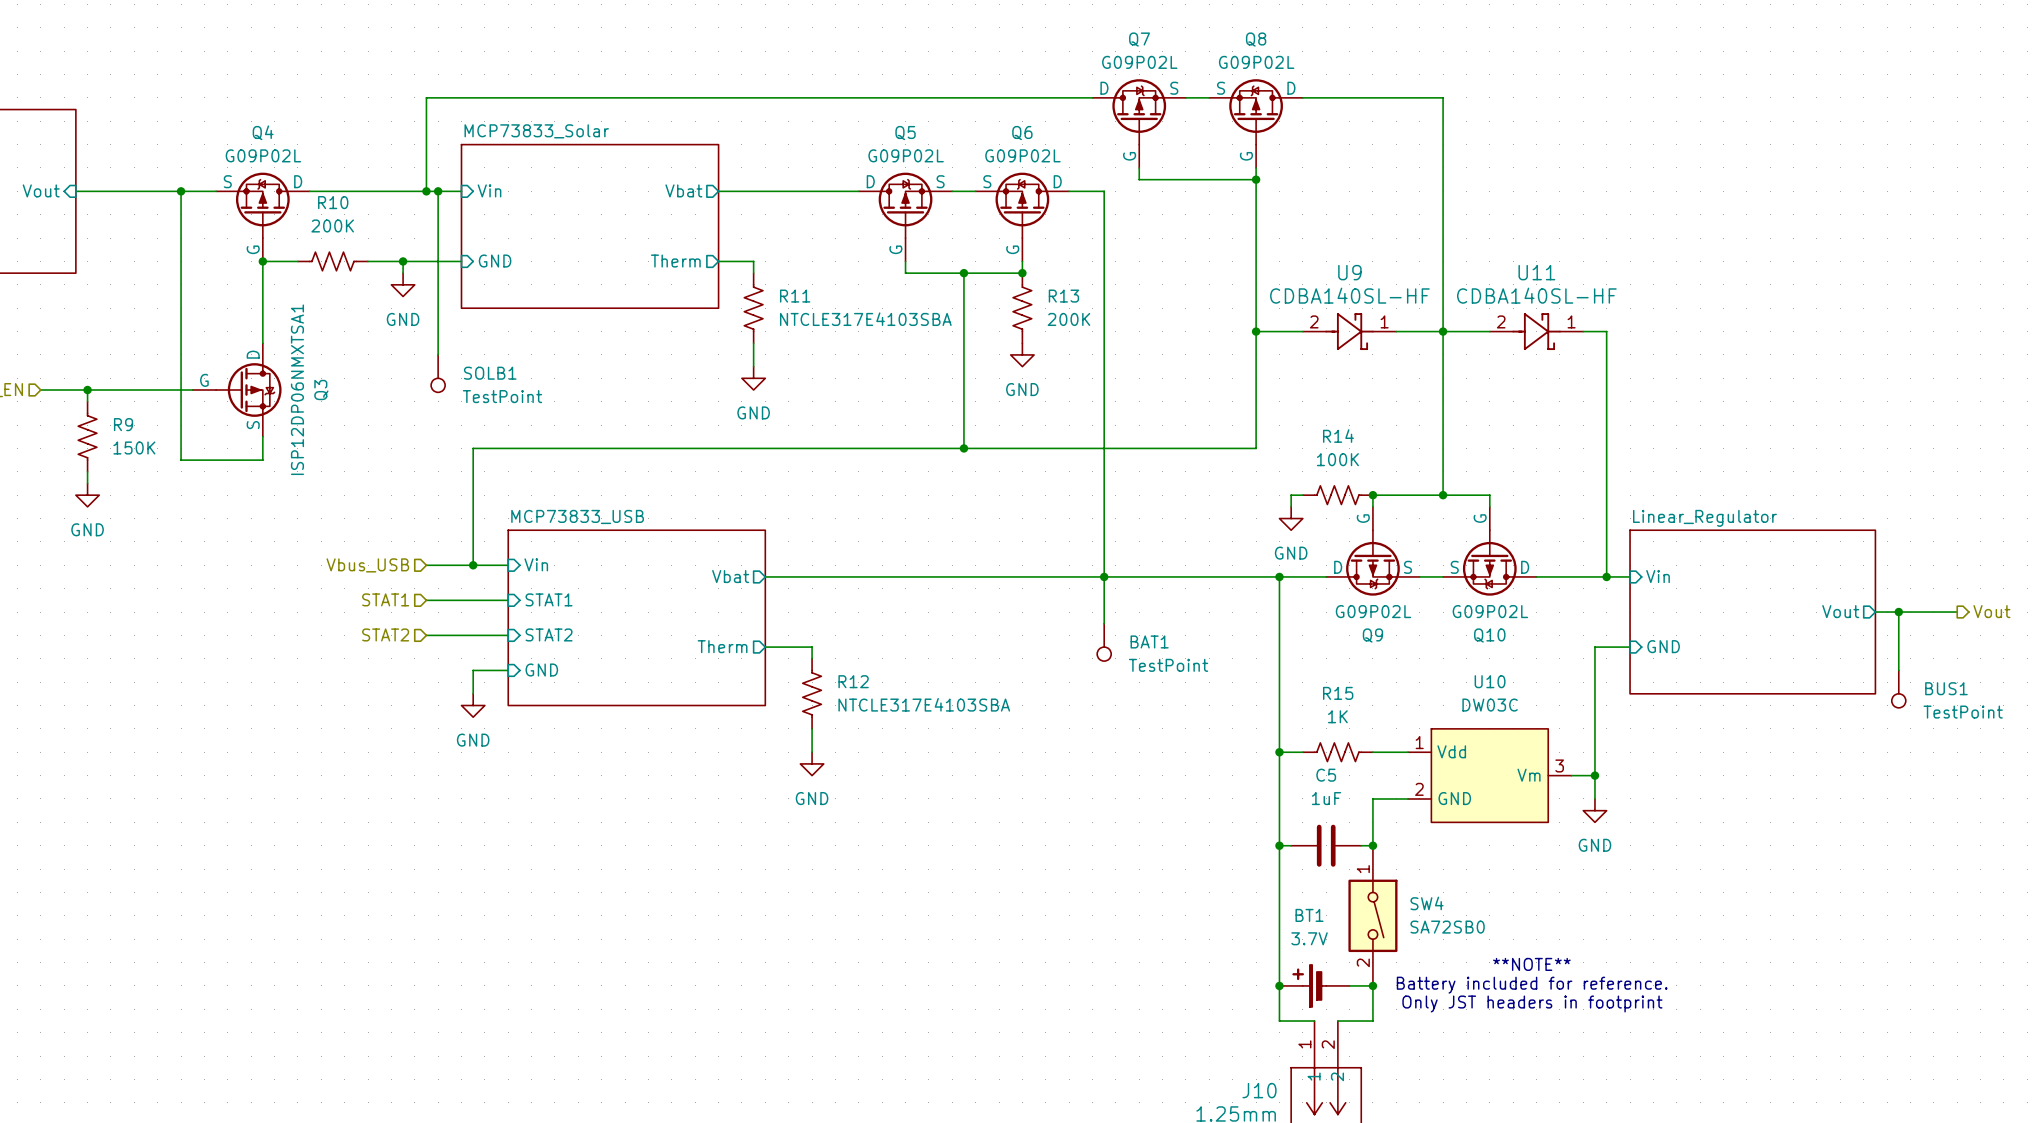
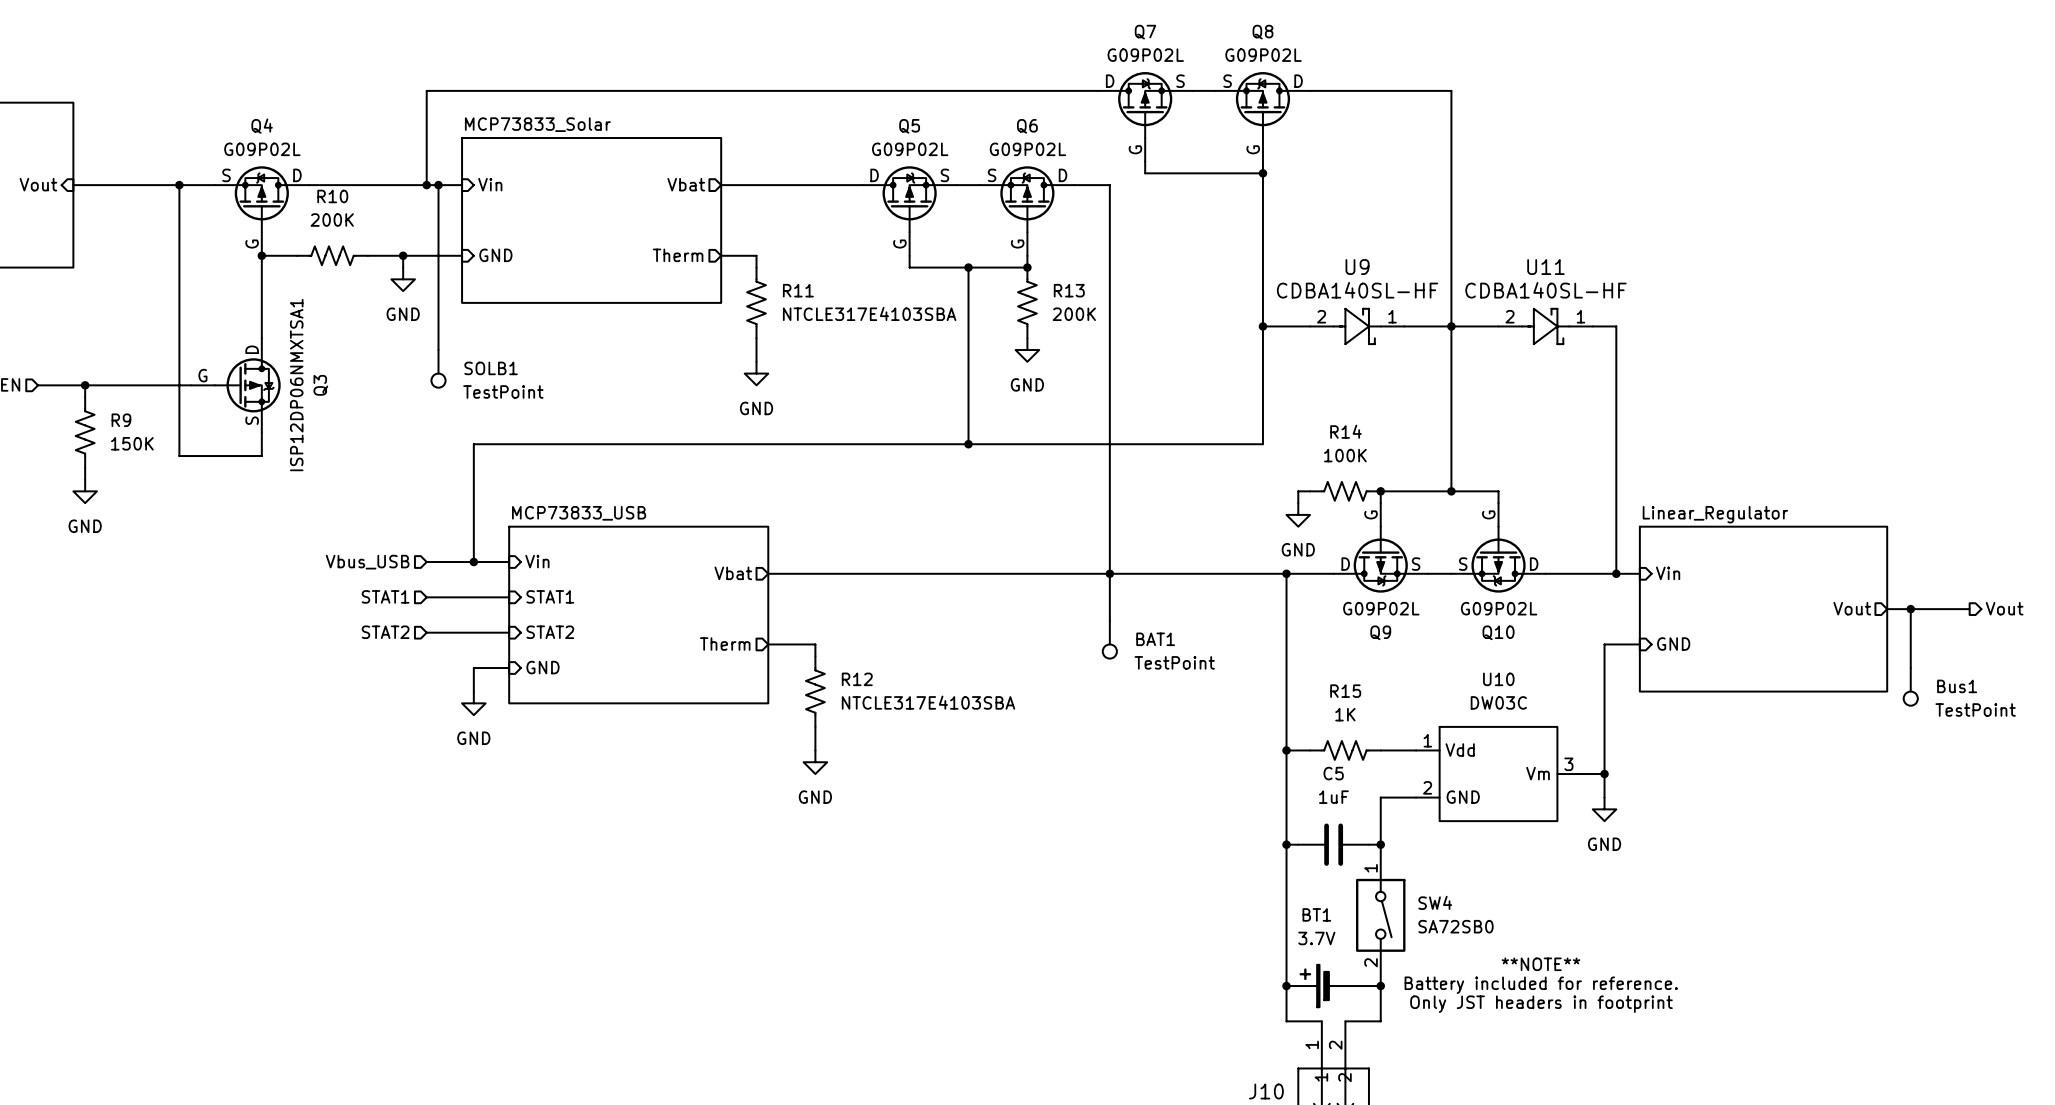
BUS1 name: BUS1 (1946, 688) -> Bus1 (1957, 686)

